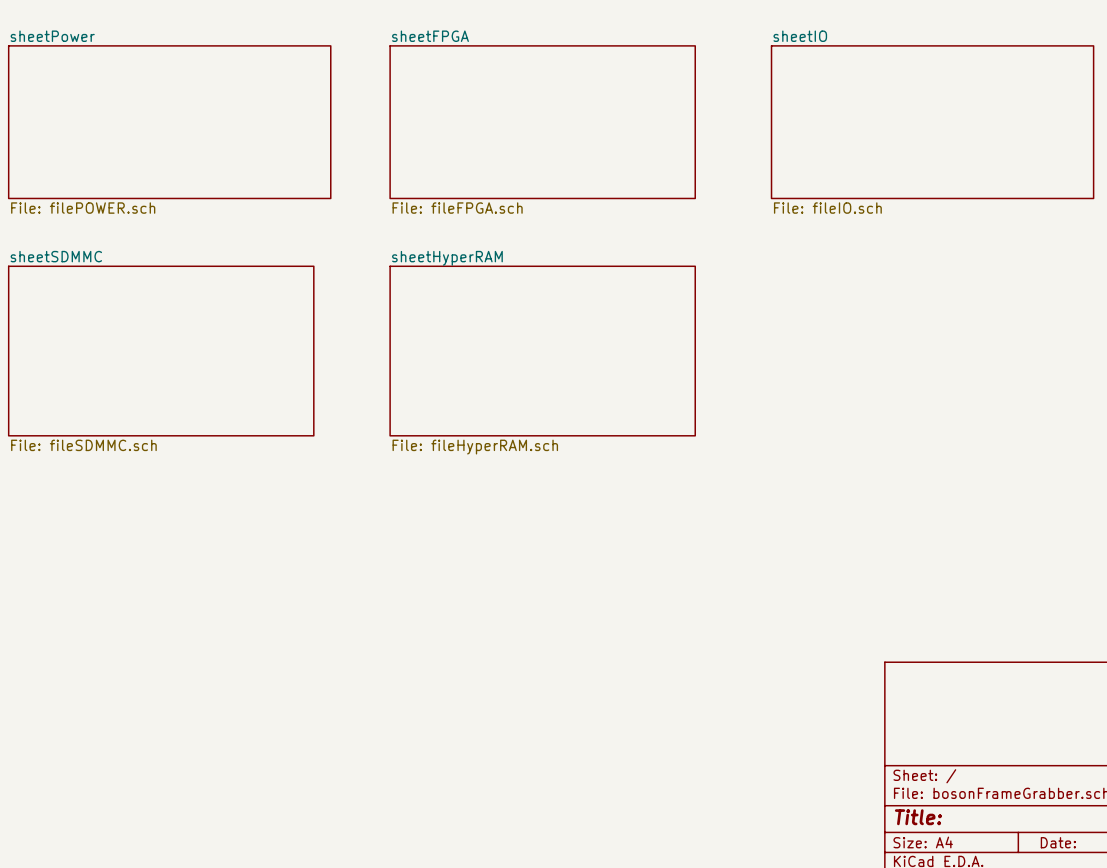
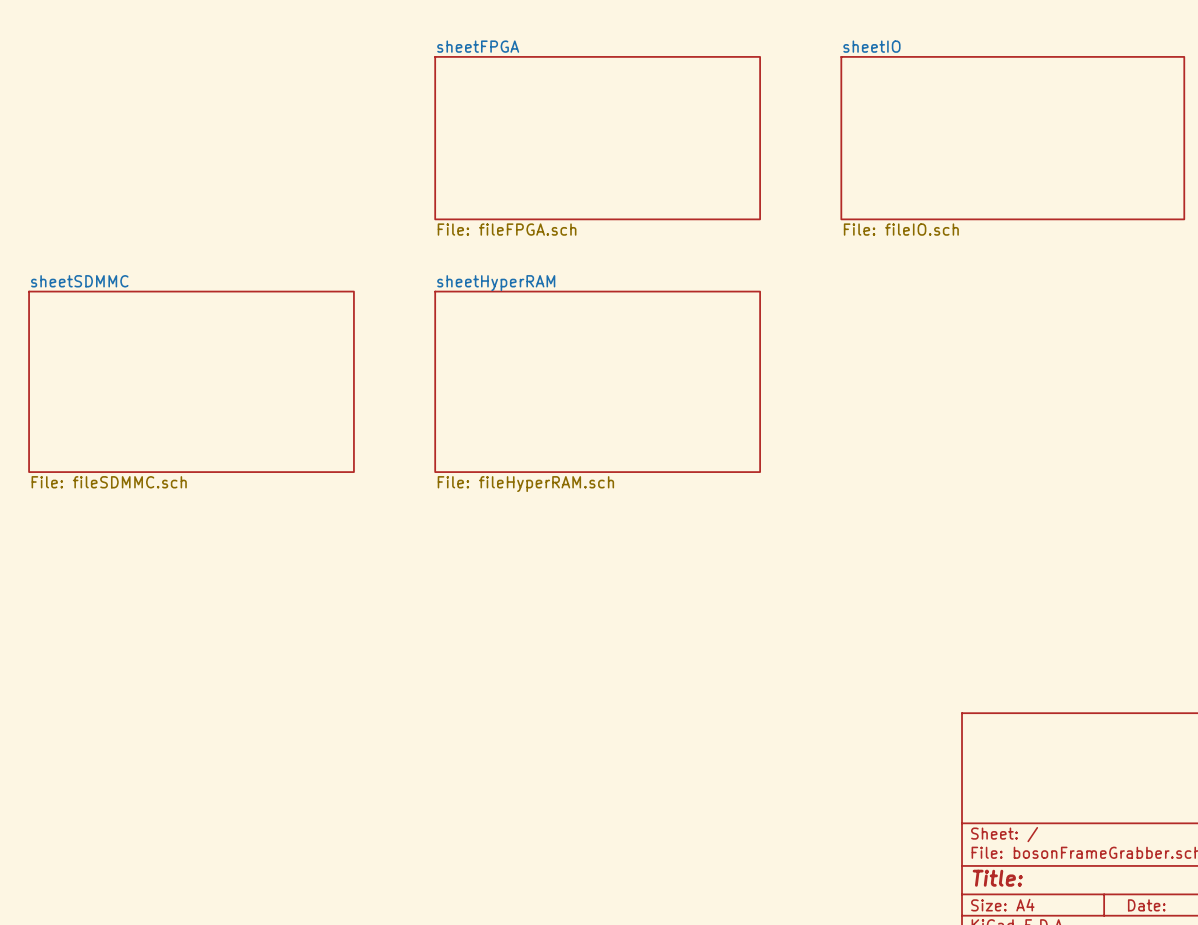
sheet sheetPower: File: filePOWER.sch (169, 122) -> none

